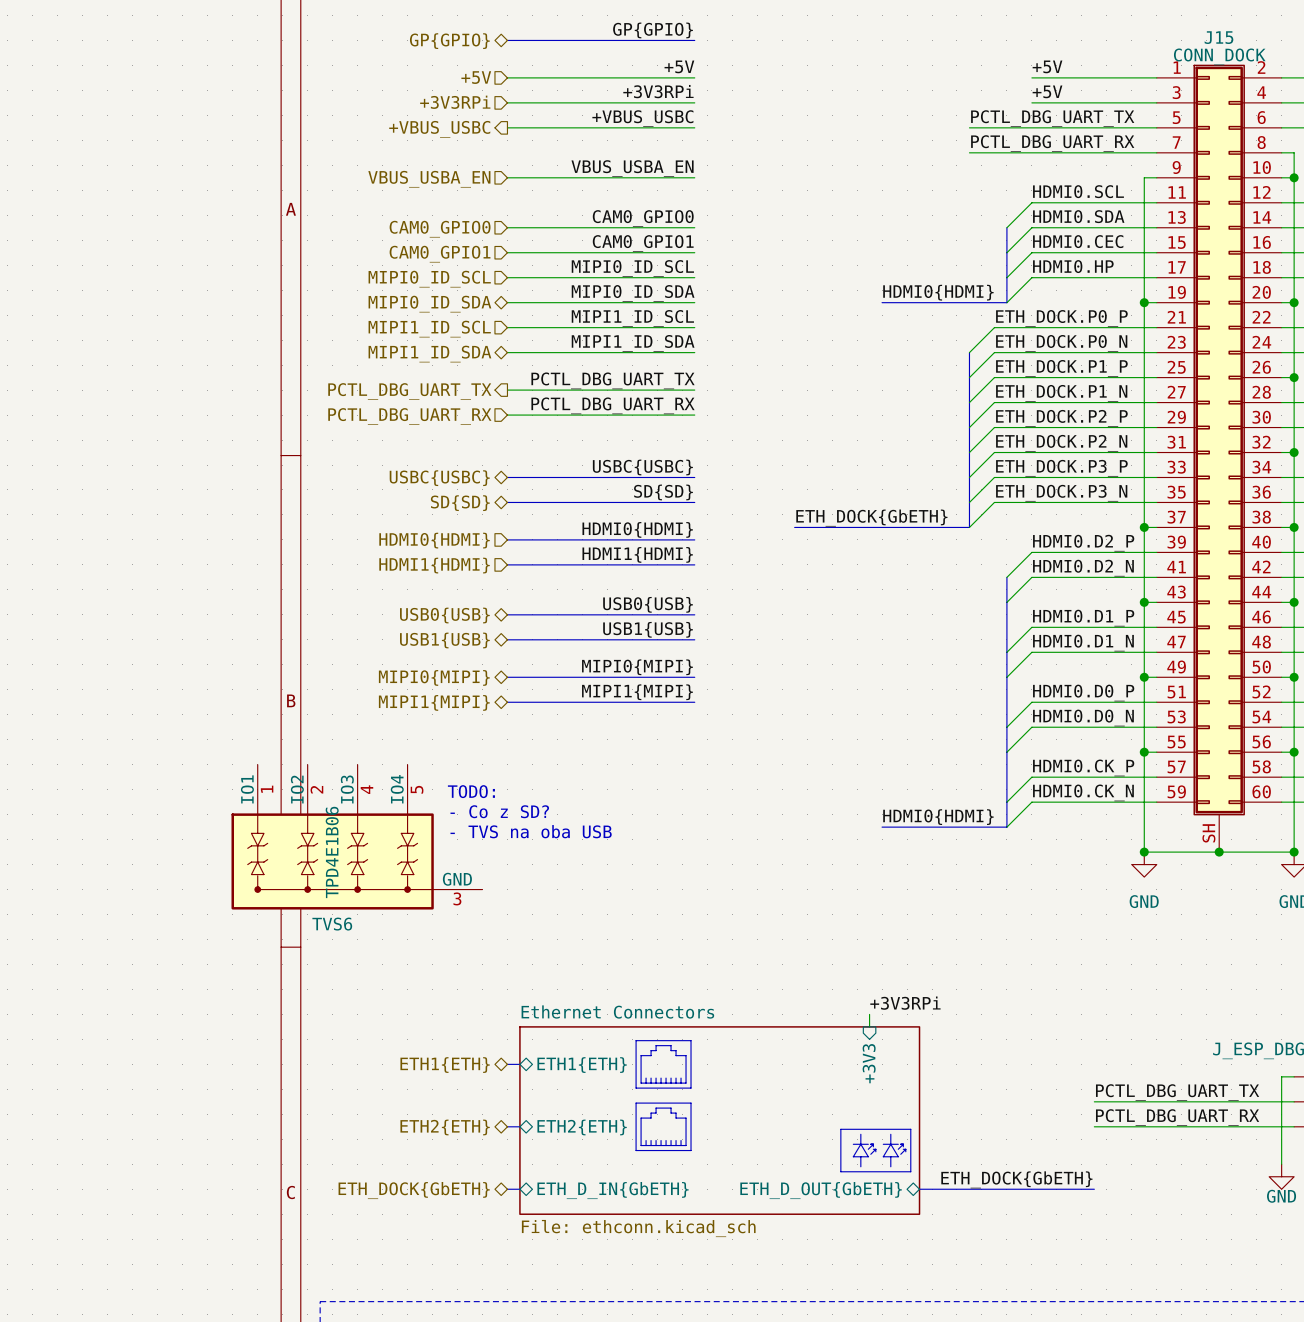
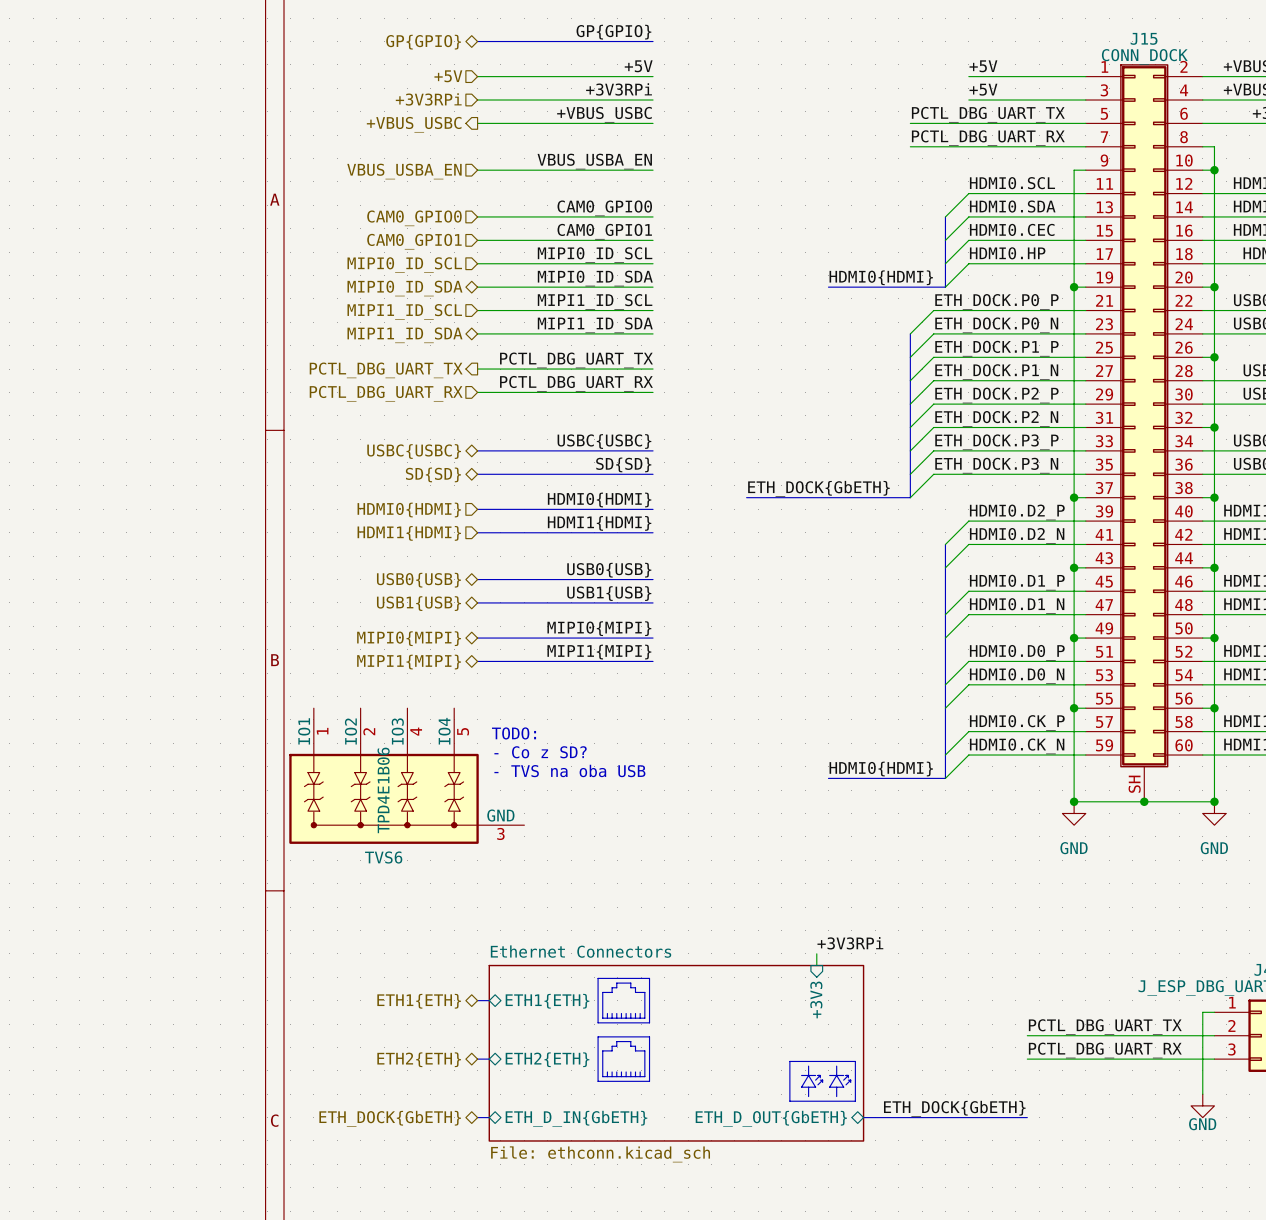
text position: TODO: (471, 791) -> TODO: (514, 733)
text position: - Co z SD? (499, 811) -> - Co z SD? (540, 752)
text position: - TVS na oba USB (531, 831) -> - TVS na oba USB (569, 770)
TVS6 position: (356, 837) -> (406, 776)

